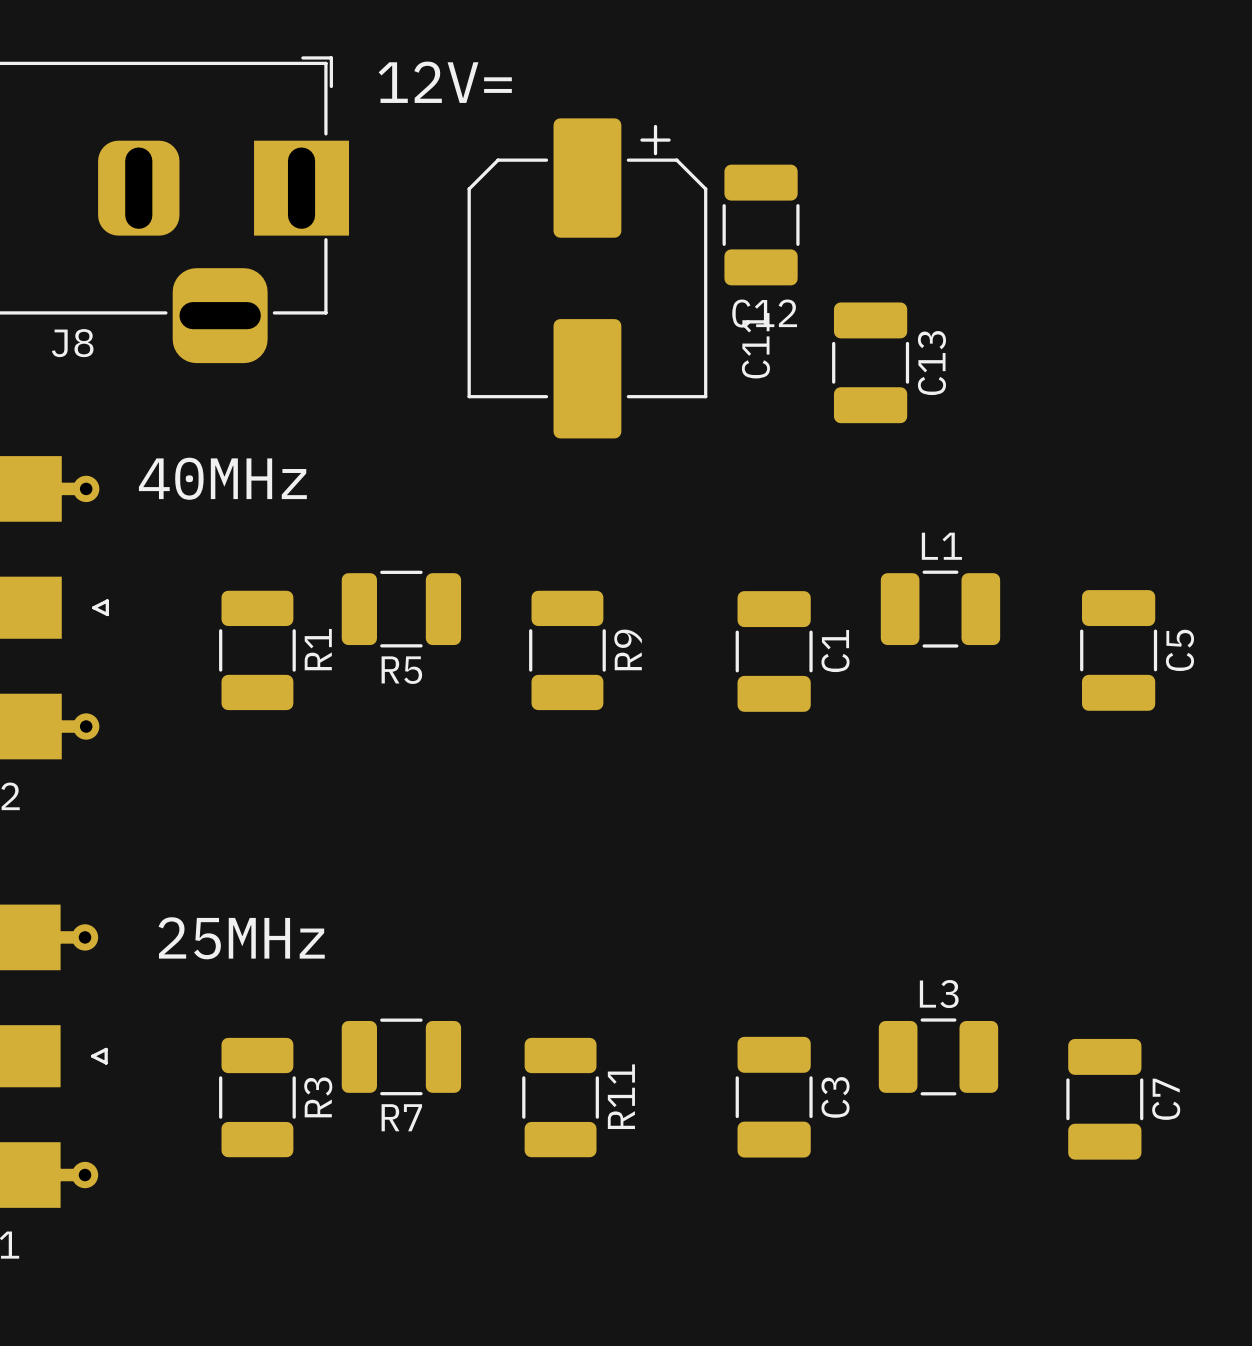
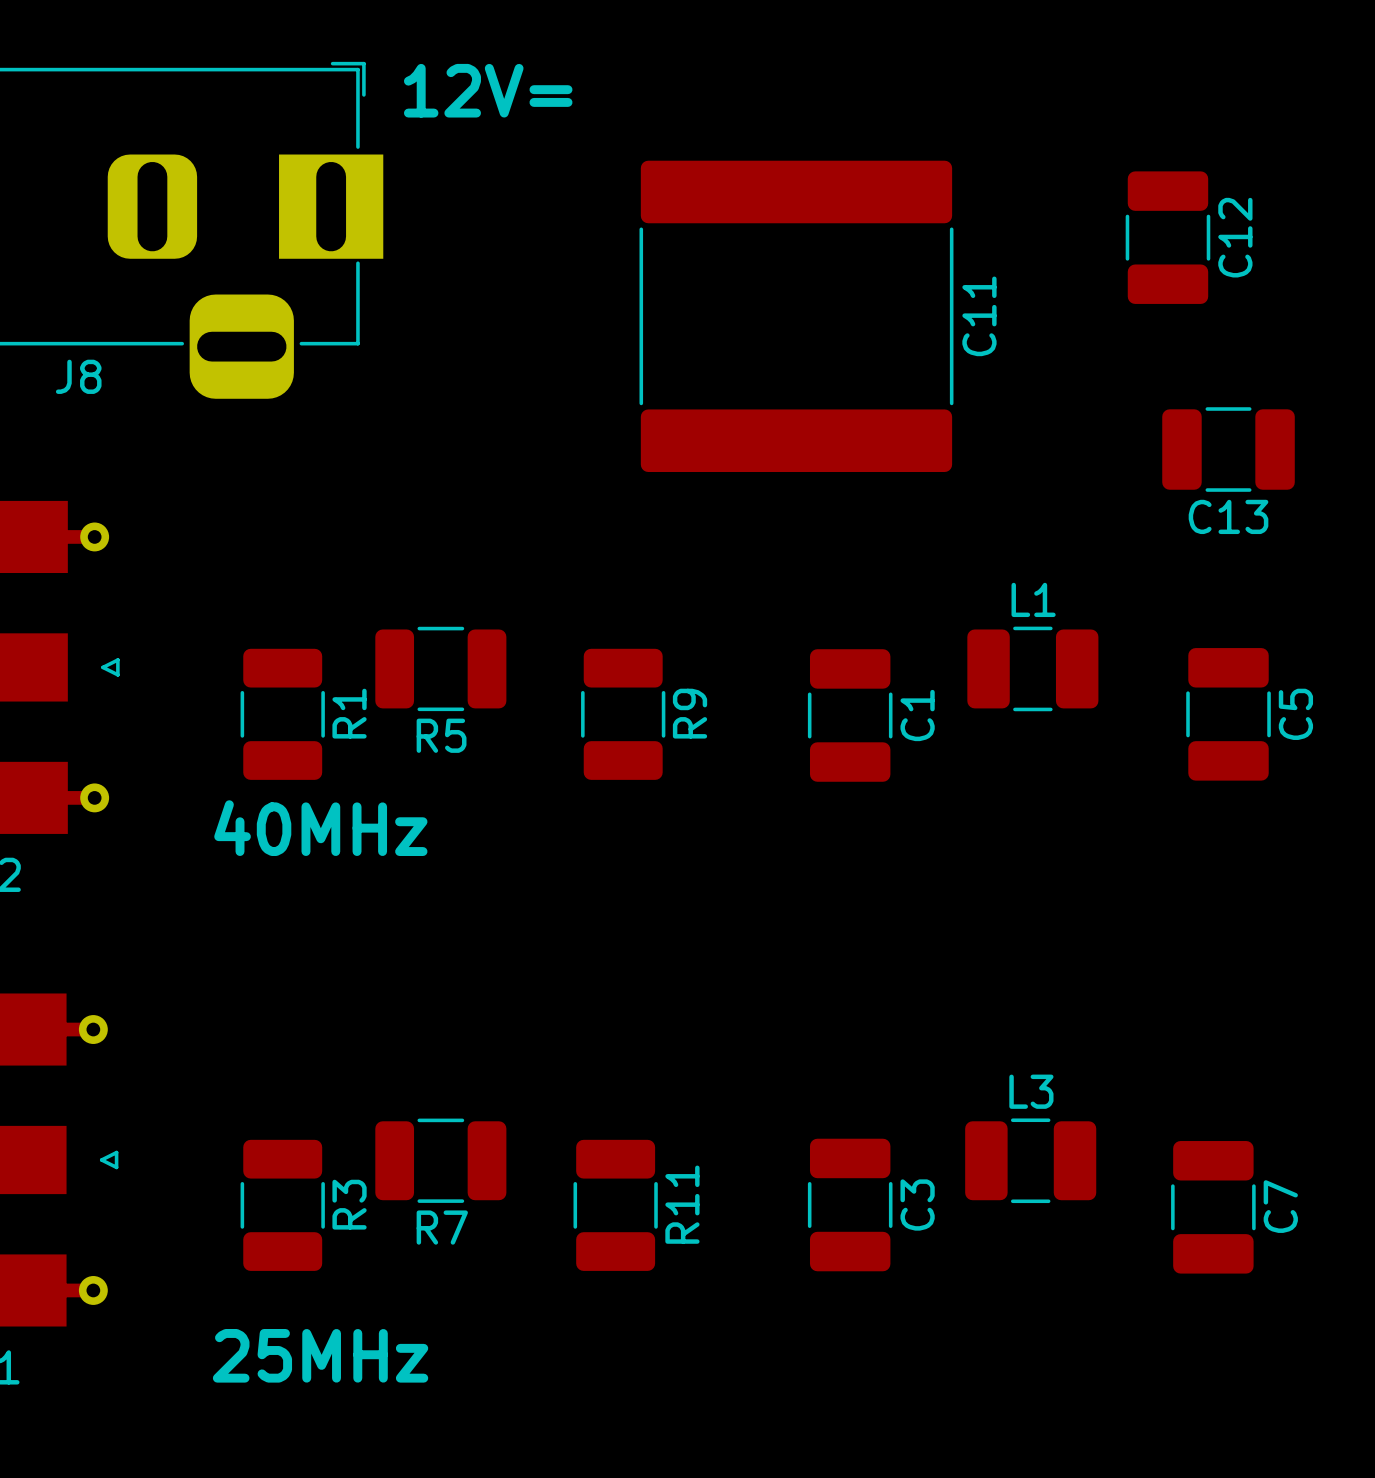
C11 footprint: [467, 118, 708, 439] -> [639, 160, 954, 473]
C12 position: (761, 225) -> (1167, 237)
C12 name rotation: 0° (764, 313) -> 90° counterclockwise (1235, 237)
C12 name position: C12 (764, 313) -> C12 (1235, 237)
C11 name position: C11 (755, 345) -> C11 (979, 316)
C13 rotation: 0° (870, 362) -> 90° clockwise (1228, 449)
C13 position: (870, 362) -> (1228, 449)
text position: 40MHz (222, 478) -> 40MHz (320, 828)
text position: 25MHz (241, 938) -> 25MHz (320, 1355)

